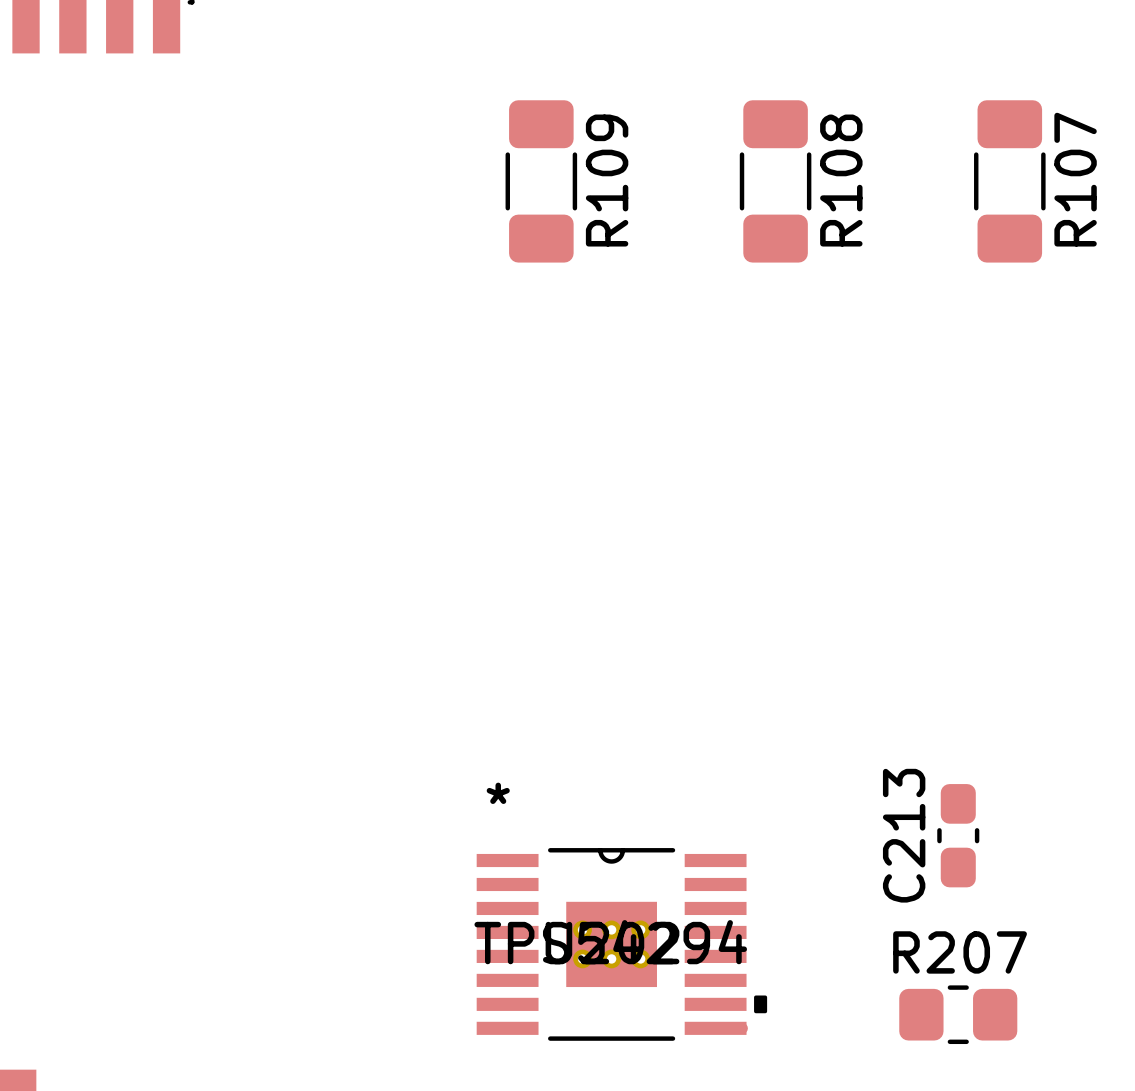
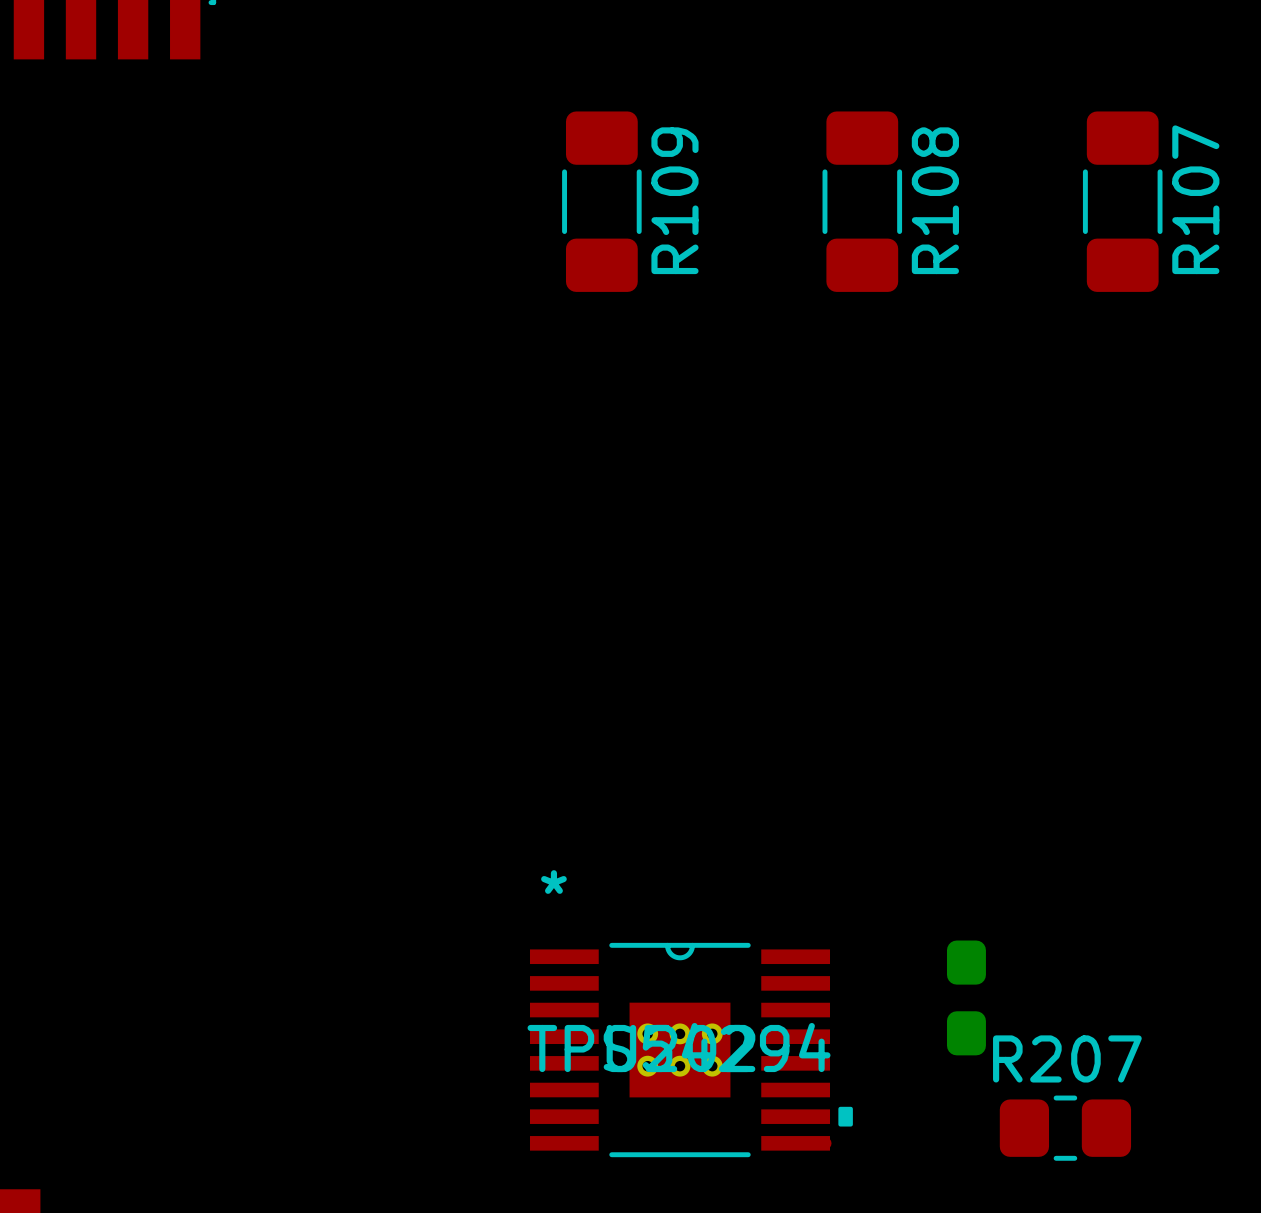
C213 side: top (958, 835) -> bottom (966, 997)

